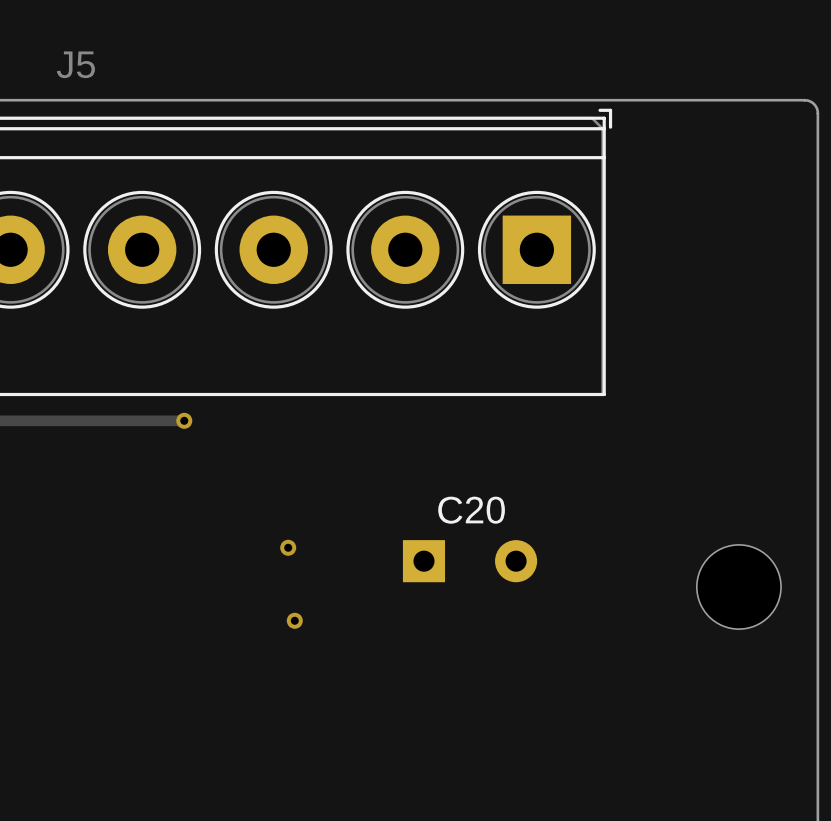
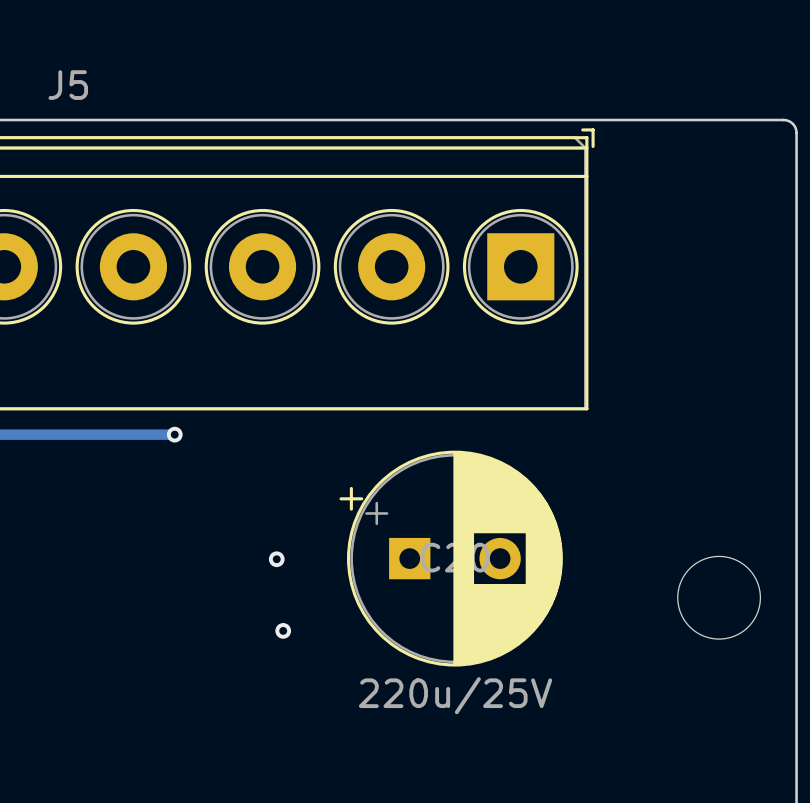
C20 side: top (470, 561) -> bottom (451, 558)

